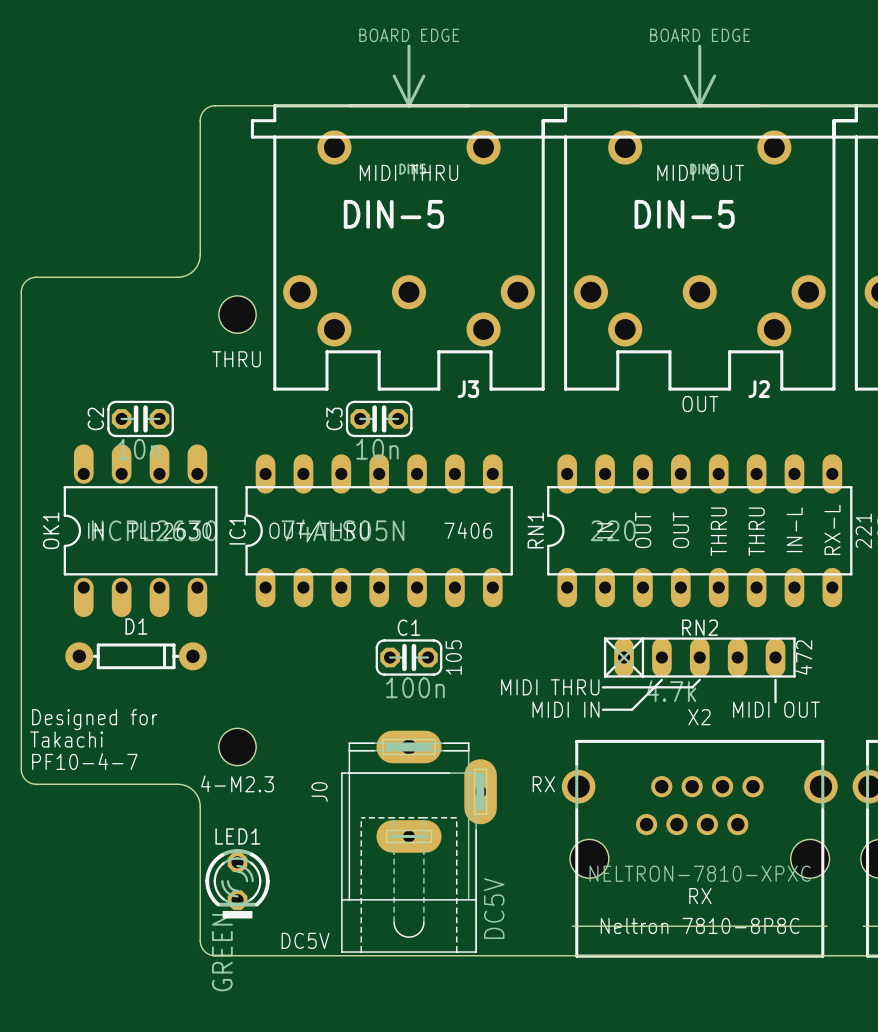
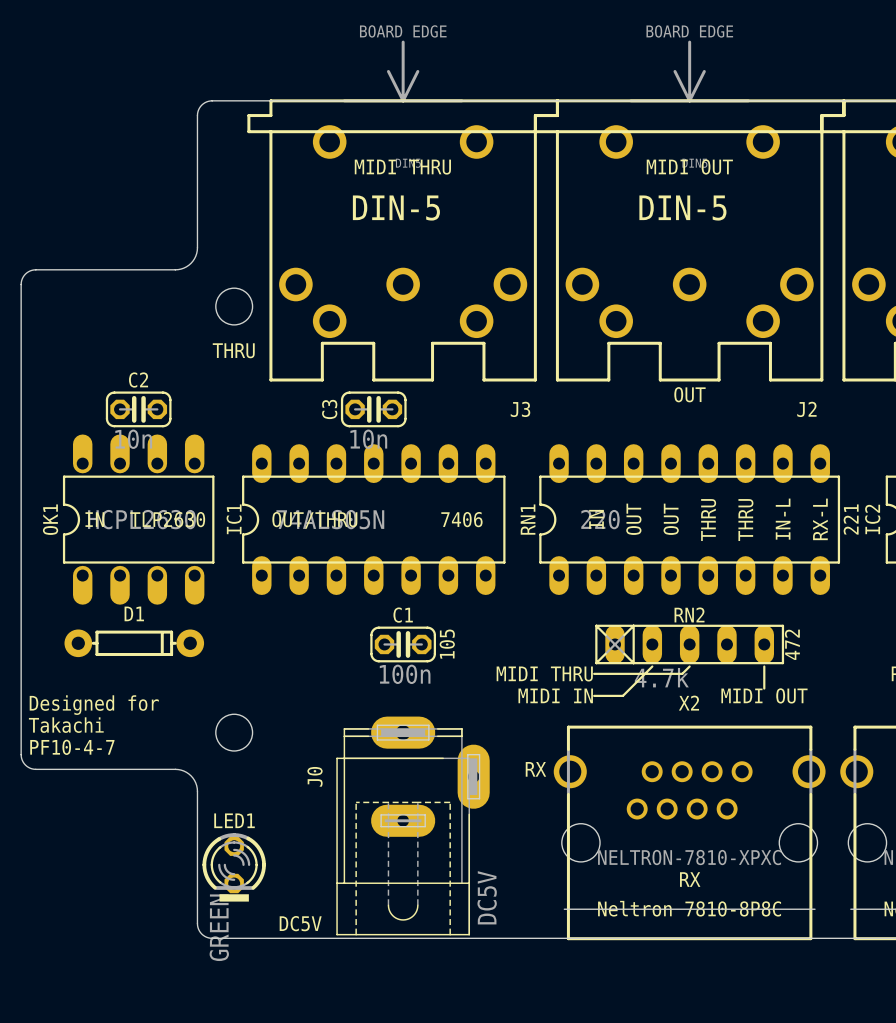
J3 name position: J3 (468, 389) -> J3 (520, 409)
J2 name position: J2 (759, 389) -> J2 (806, 409)
C2 name rotation: 0° (95, 418) -> 90° clockwise (138, 380)
C2 name position: C2 (95, 418) -> C2 (138, 380)
text: 4-M2.3 (237, 783) -> none

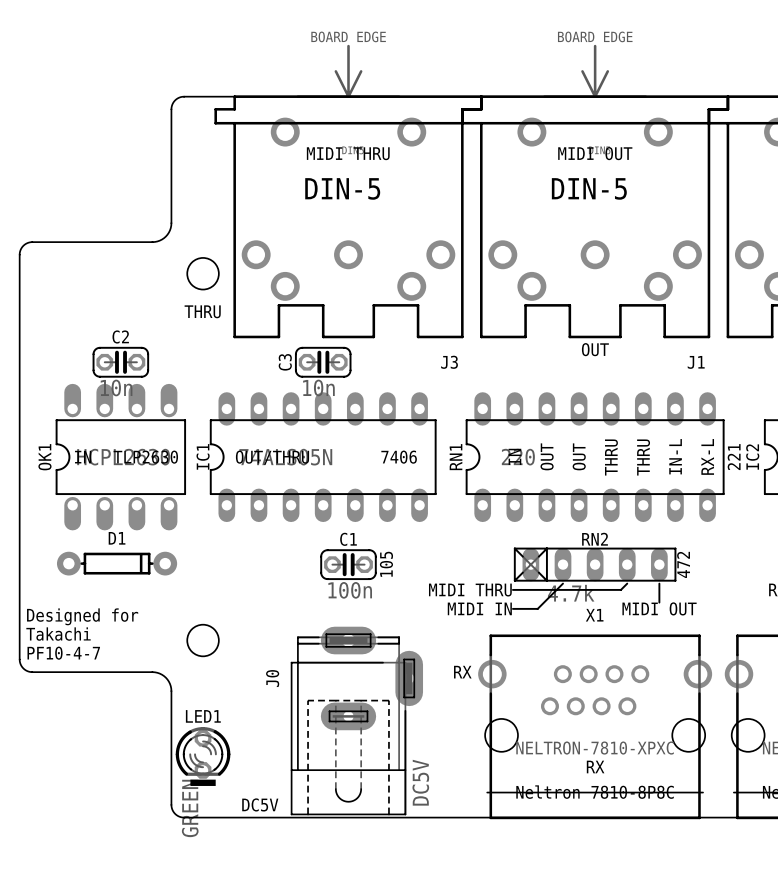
J2 name: J2 (806, 409) -> J1 (696, 362)
line: (689, 666) (682, 673) -> (627, 583) (620, 589) (588, 589)
X2 name: X2 (688, 703) -> X1 (594, 615)

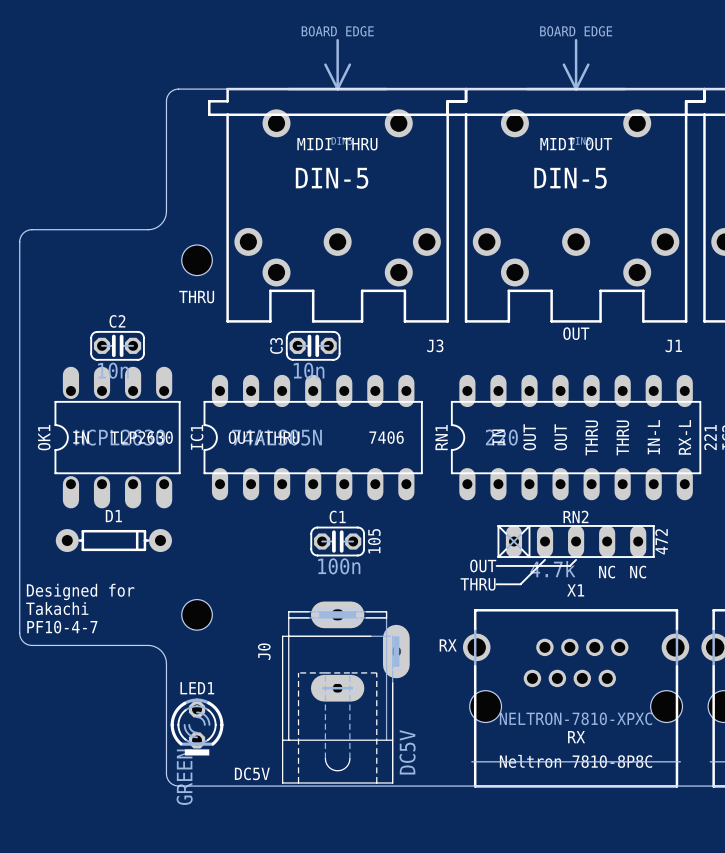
line: (627, 583) (620, 589) (588, 589) -> (576, 559) (569, 565)
line: (659, 583) (659, 602) -> none
text: MIDI THRU (470, 590) -> OUT (483, 565)
text: none -> NC (607, 572)
text: MIDI IN (479, 608) -> THRU (478, 584)
text: MIDI OUT (659, 608) -> NC (638, 572)

